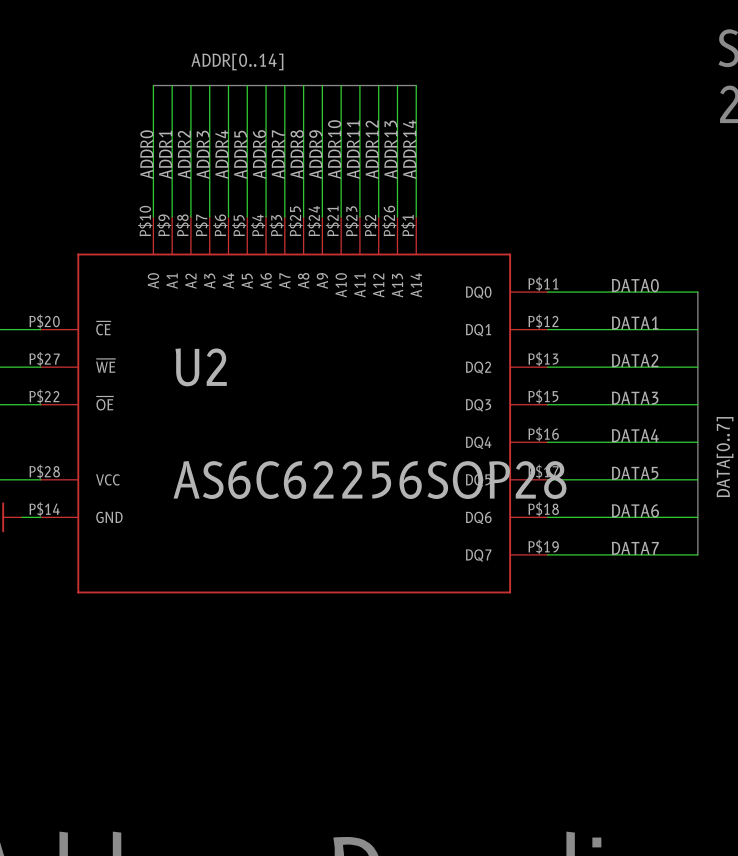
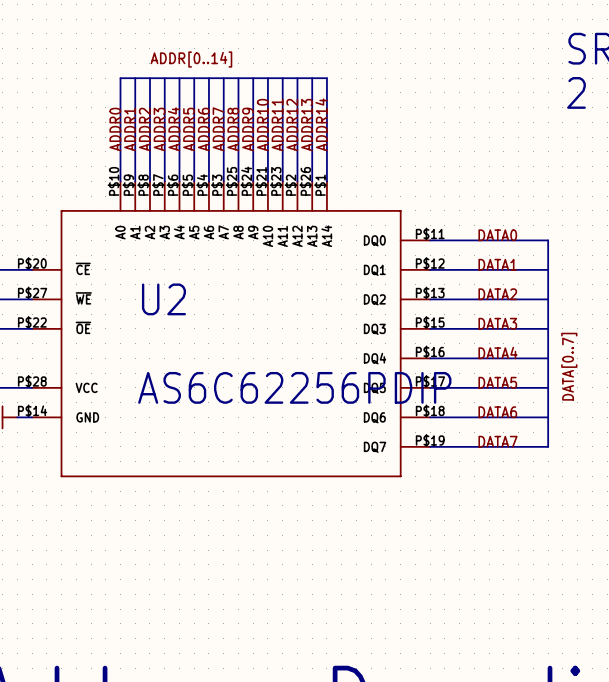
U2 value: AS6C62256SOP28 (369, 480) -> AS6C62256PDIP (294, 387)

